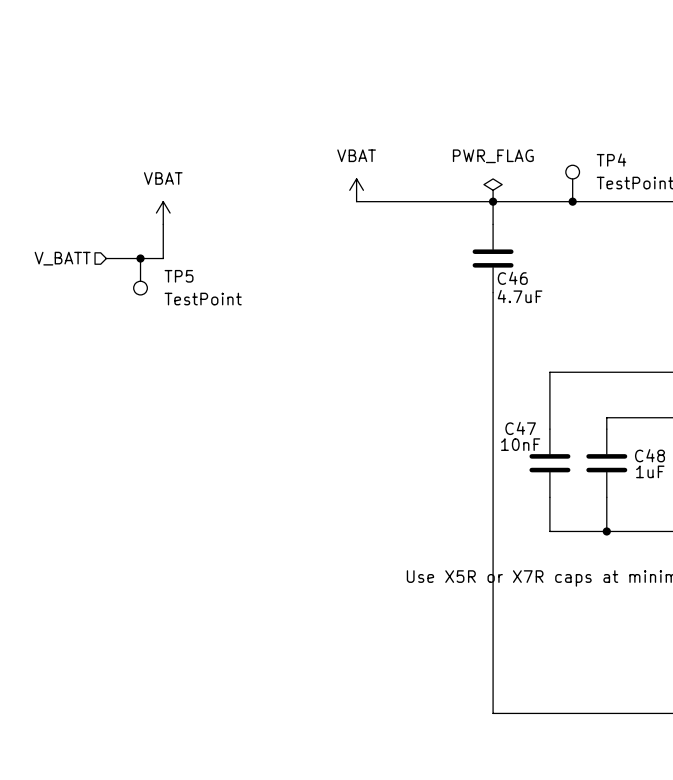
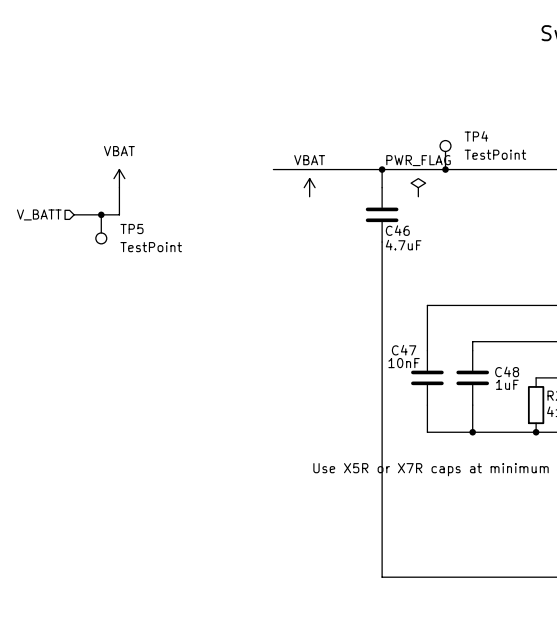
power symbol position: VBAT (356, 190) -> VBAT (309, 187)
power symbol position: PWR_FLAG (493, 190) -> PWR_FLAG (418, 187)

